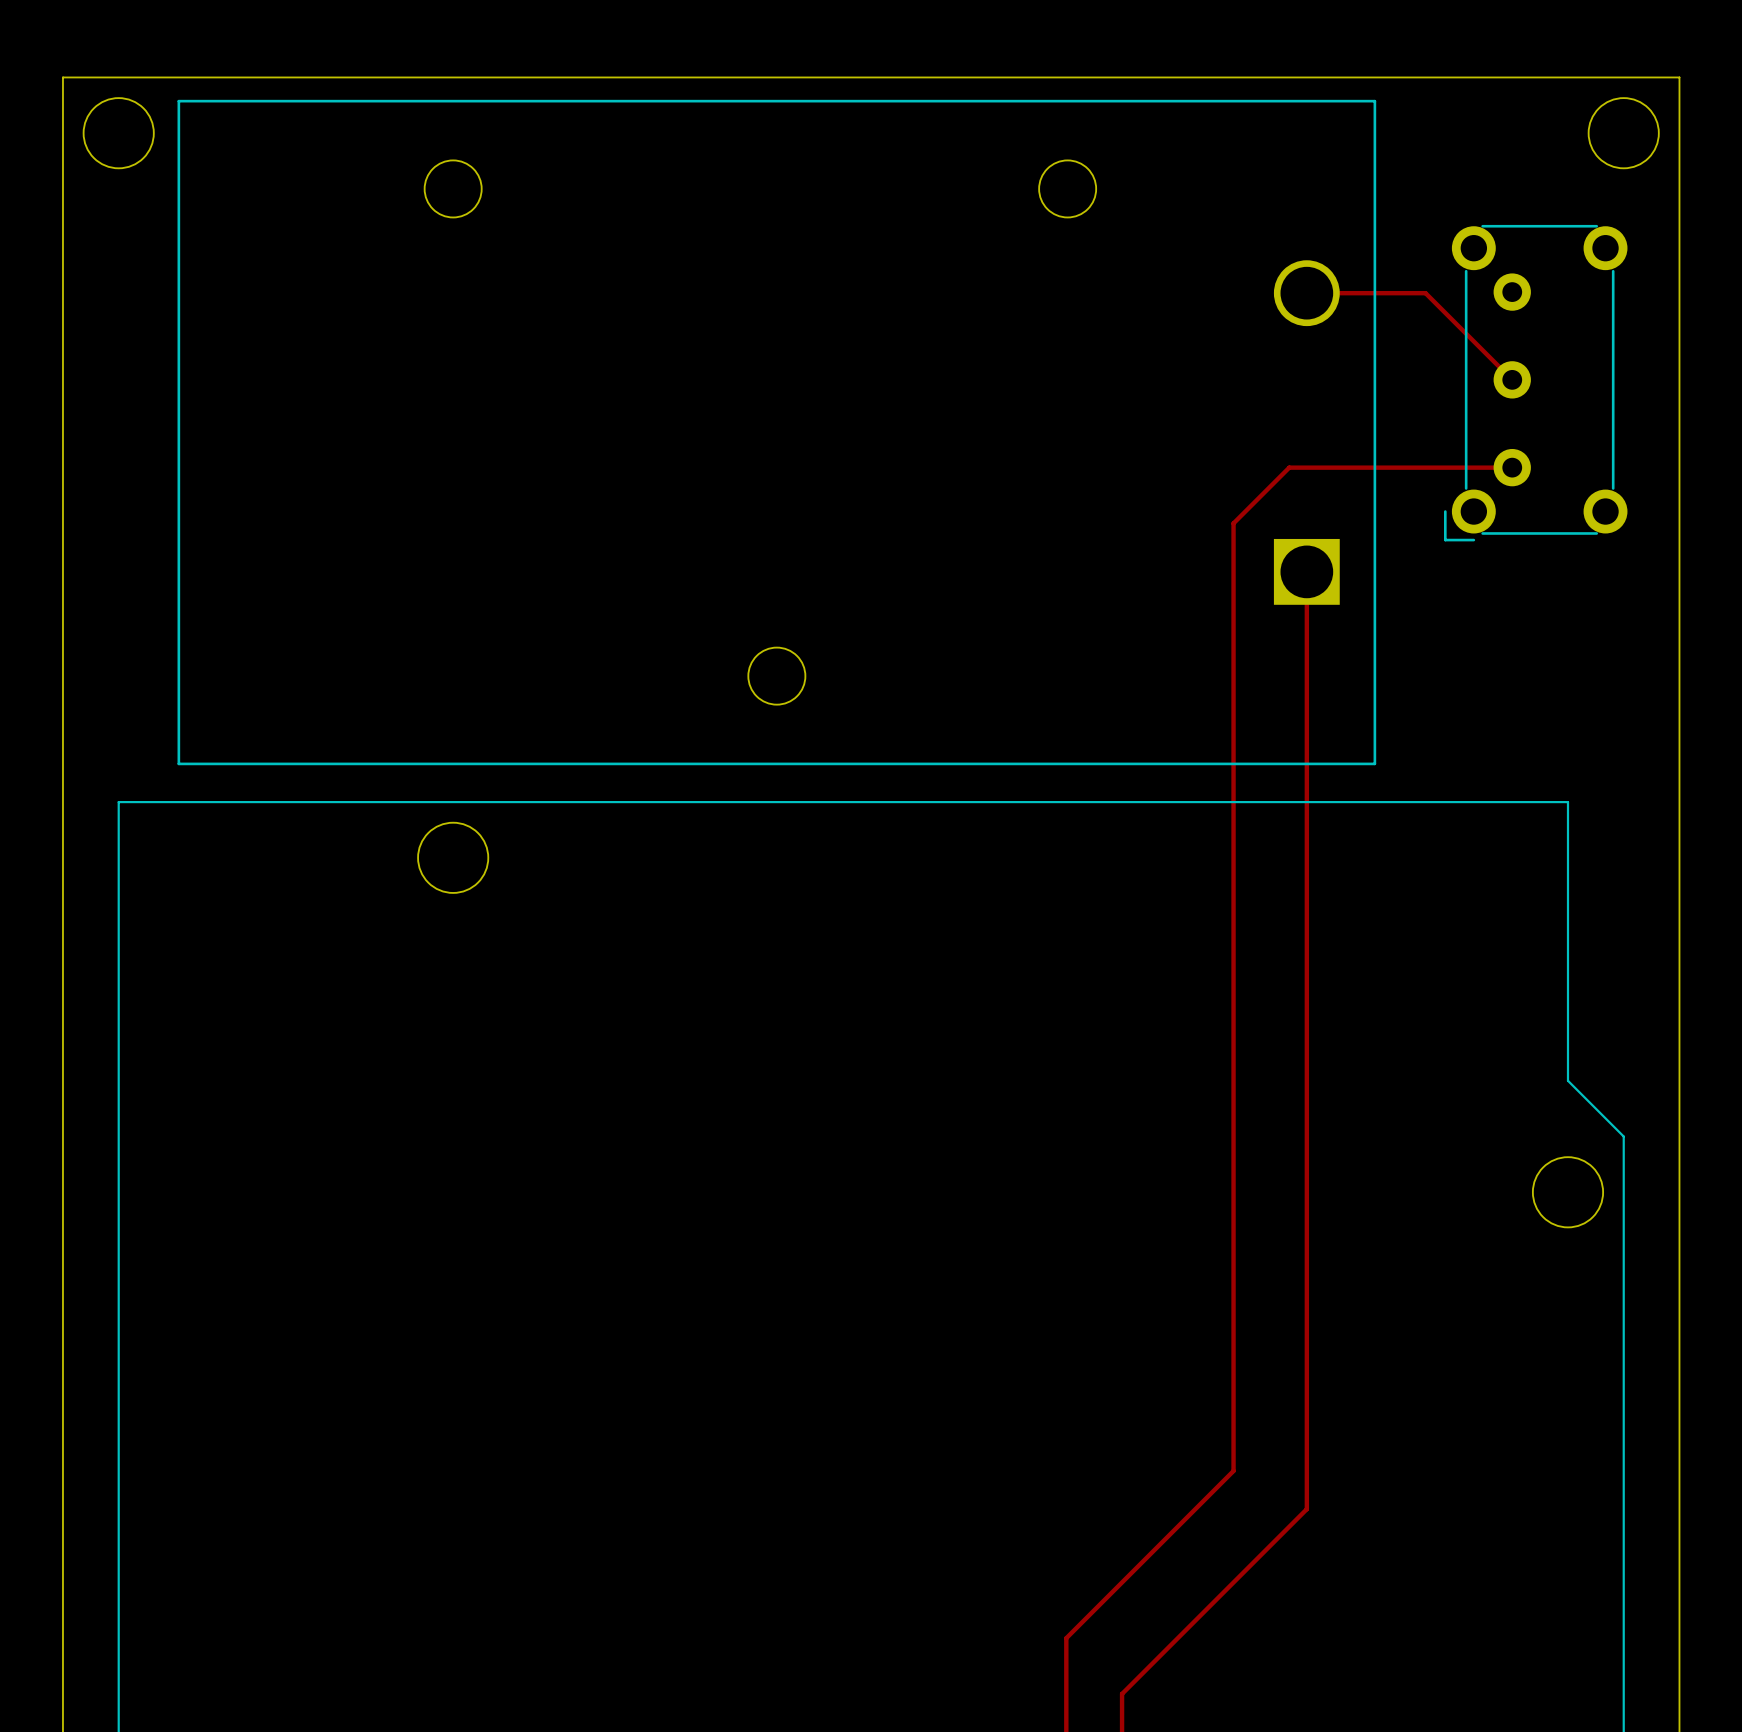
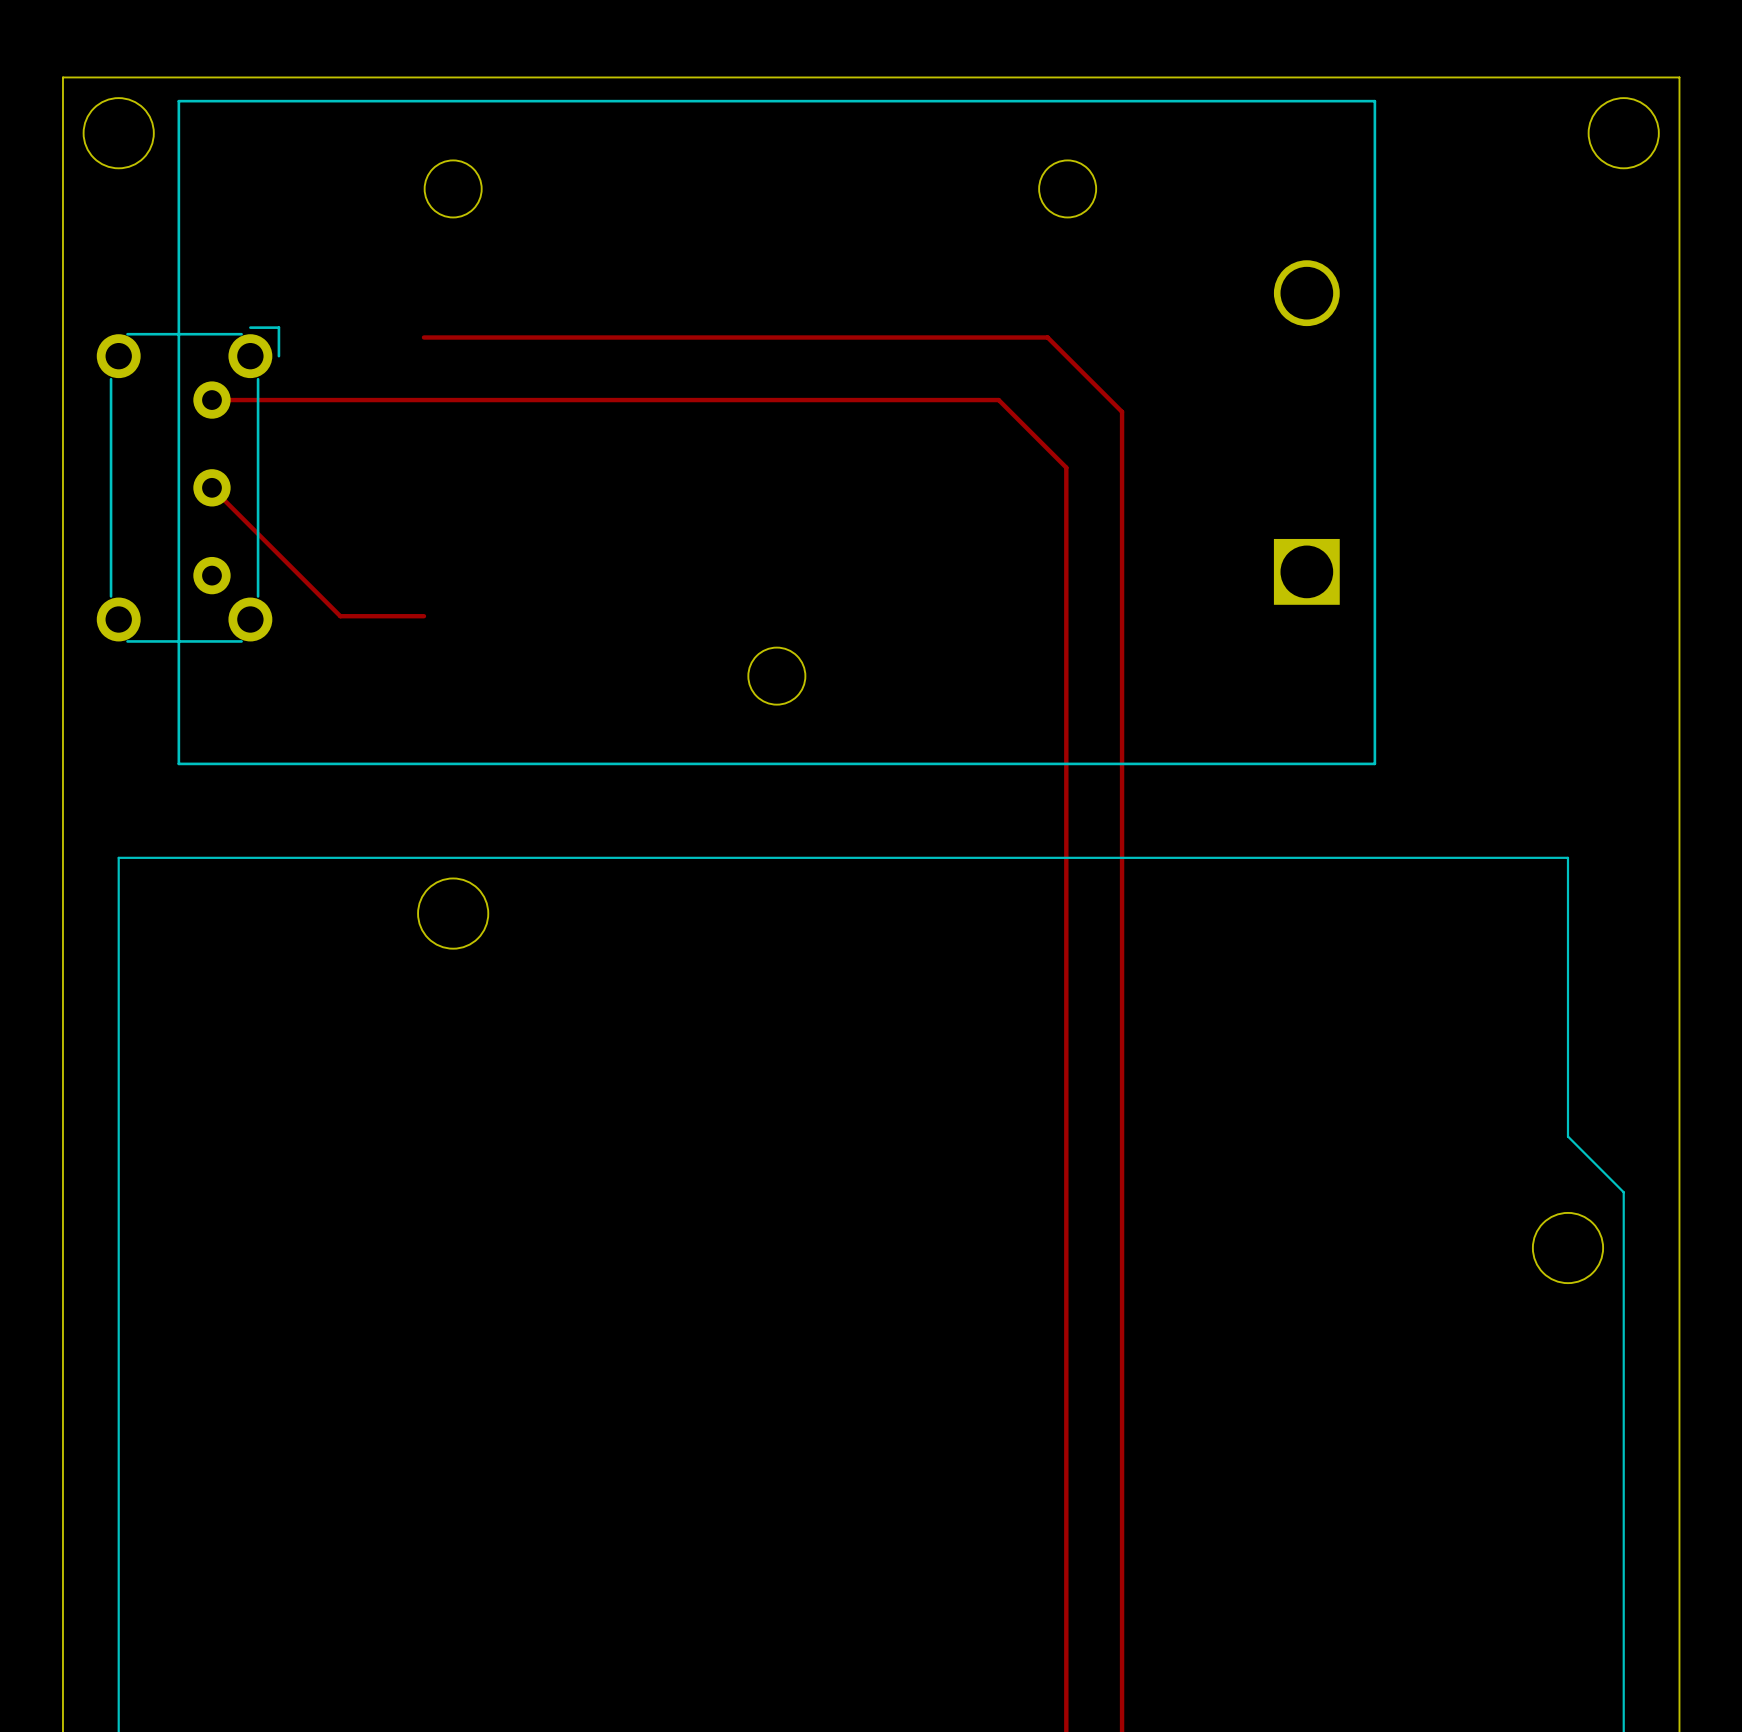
top track: (1306, 293) (1425, 293) (1512, 379) -> none
part: (1535, 383) -> none
top track: (1512, 467) (1289, 467) (1233, 523) (1233, 1470) (1066, 1638) -> (211, 400) (998, 400) (1066, 467) (1066, 1638)
part: none -> (188, 484)
top track: none -> (211, 487) (340, 616) (423, 616)
top track: (1306, 571) (1306, 1509) (1122, 1693) -> (423, 337) (1047, 337) (1122, 411) (1122, 1693)
line: (118, 857) (118, 802) (1567, 802) (1567, 857) -> (118, 857) (1567, 857)
round board edge position: (453, 857) -> (453, 913)
line: (1567, 1080) (1623, 1136) (1623, 1192) -> (1567, 1080) (1567, 1136) (1623, 1192)
round board edge position: (1567, 1192) -> (1567, 1248)

